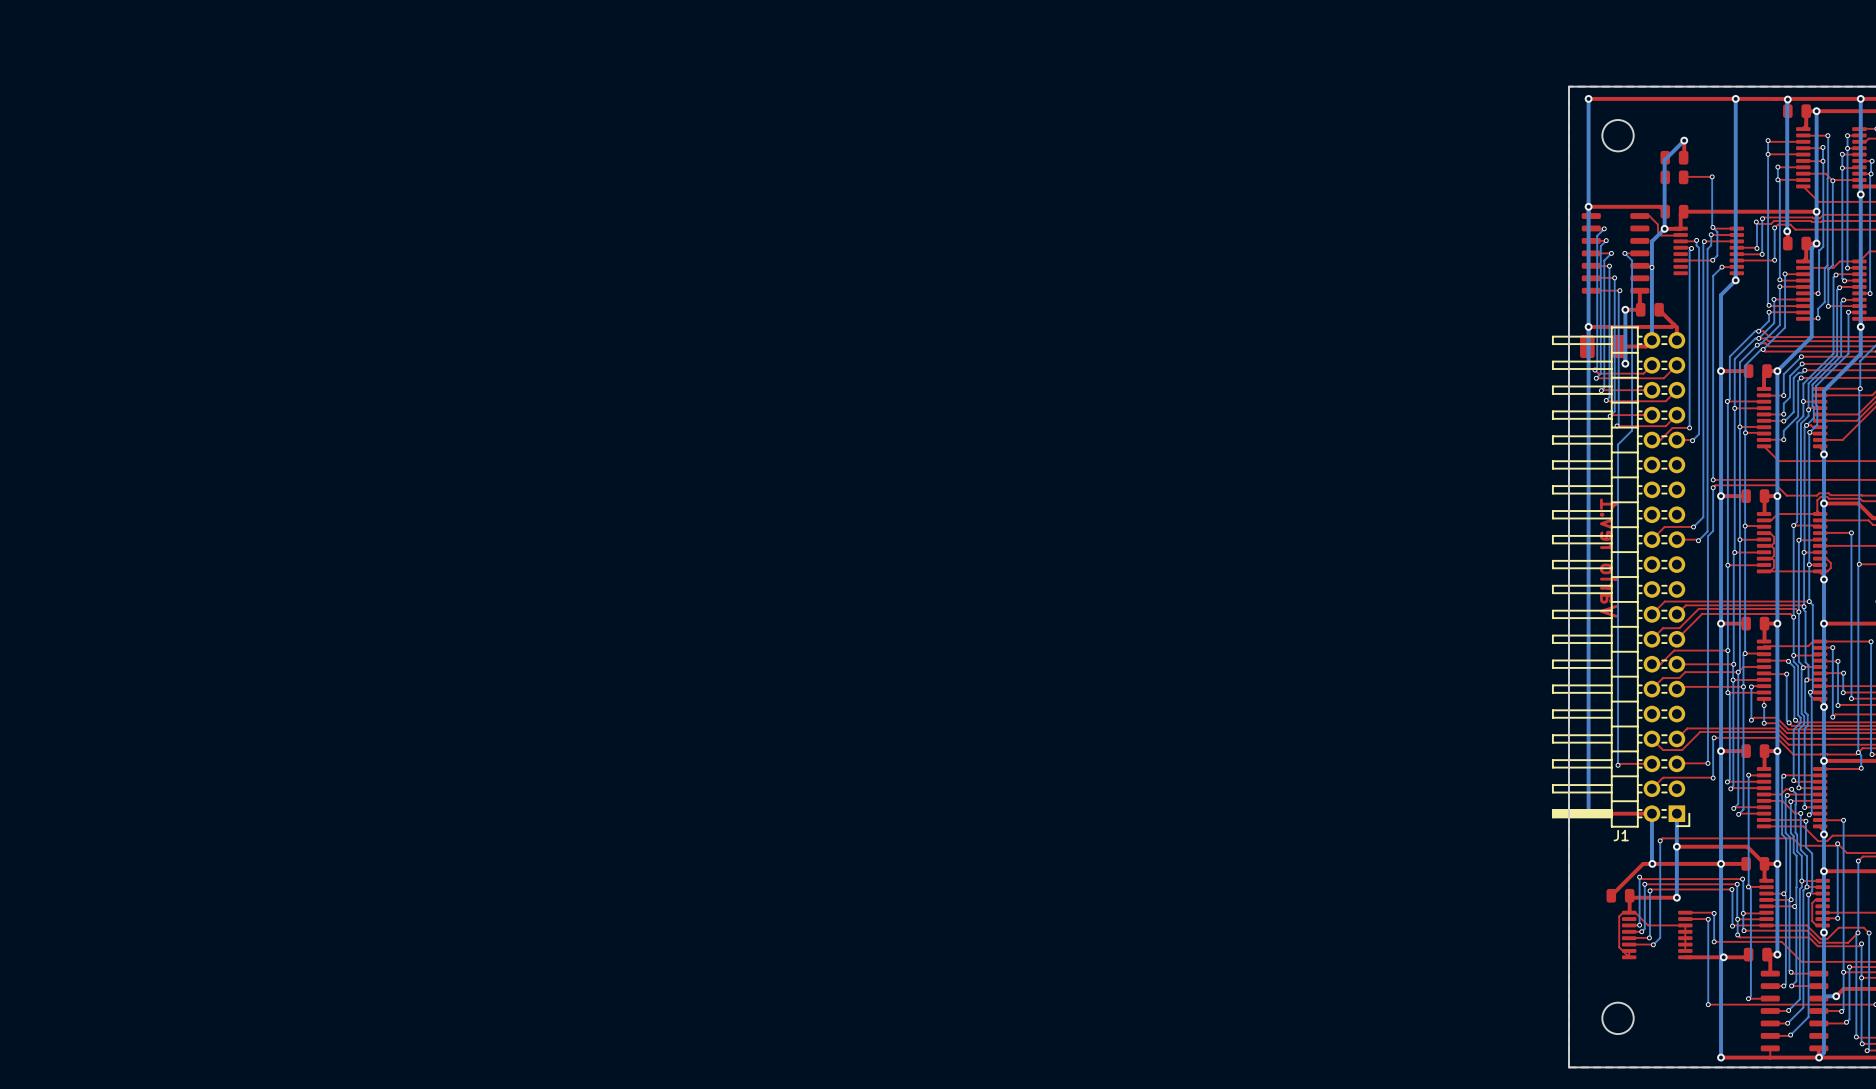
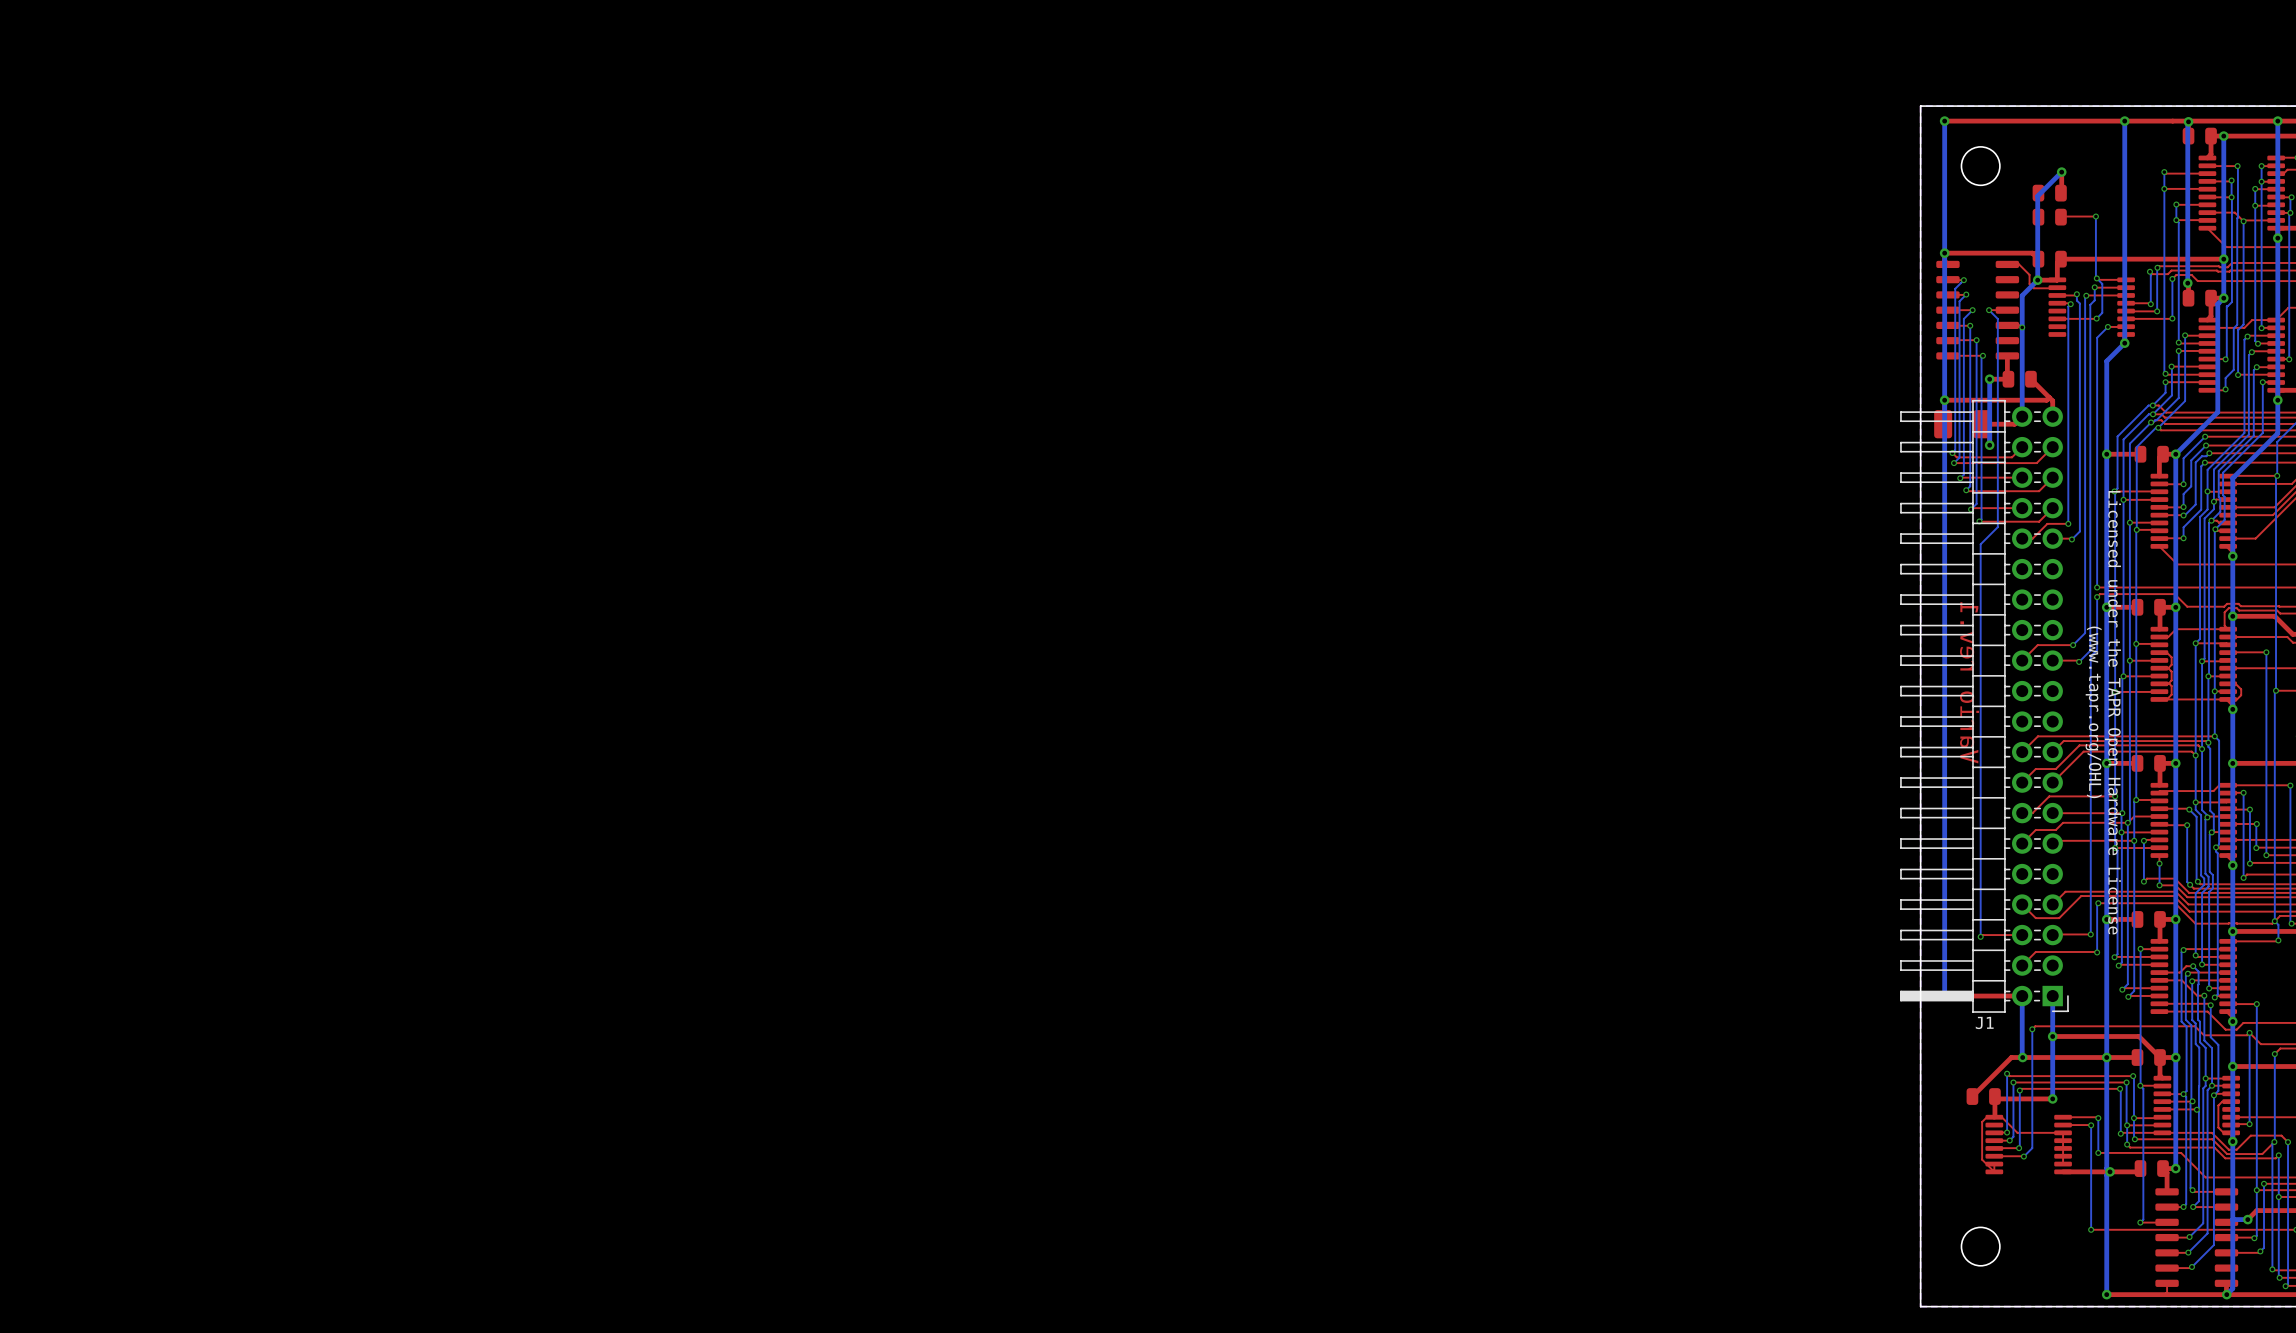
text: none -> (www.tapr.org/OHL) (2093, 712)
text: none -> Licensed under the TAPR Open Hardware License (2112, 712)

